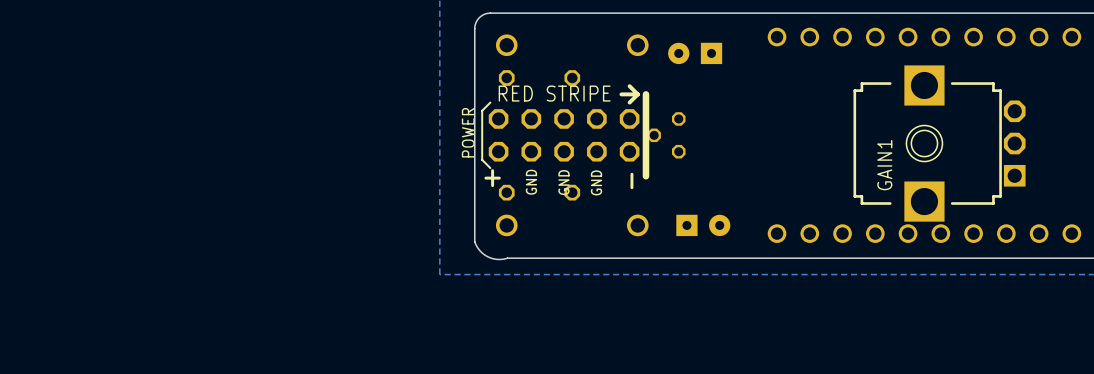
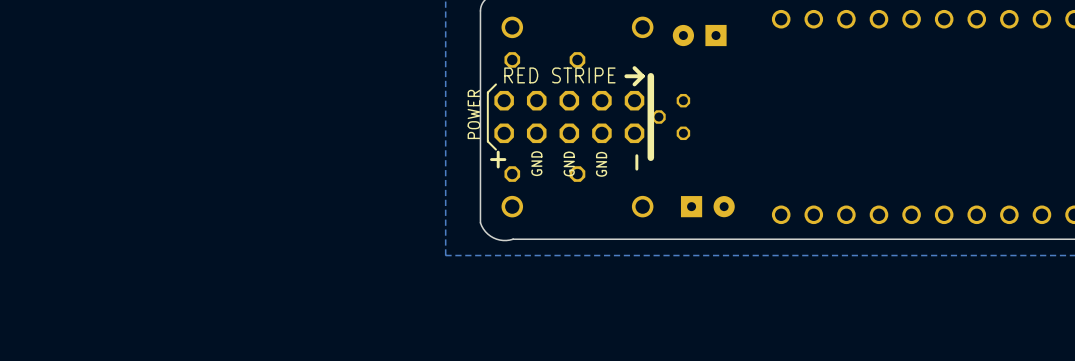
GAIN1: (939, 143) -> none

